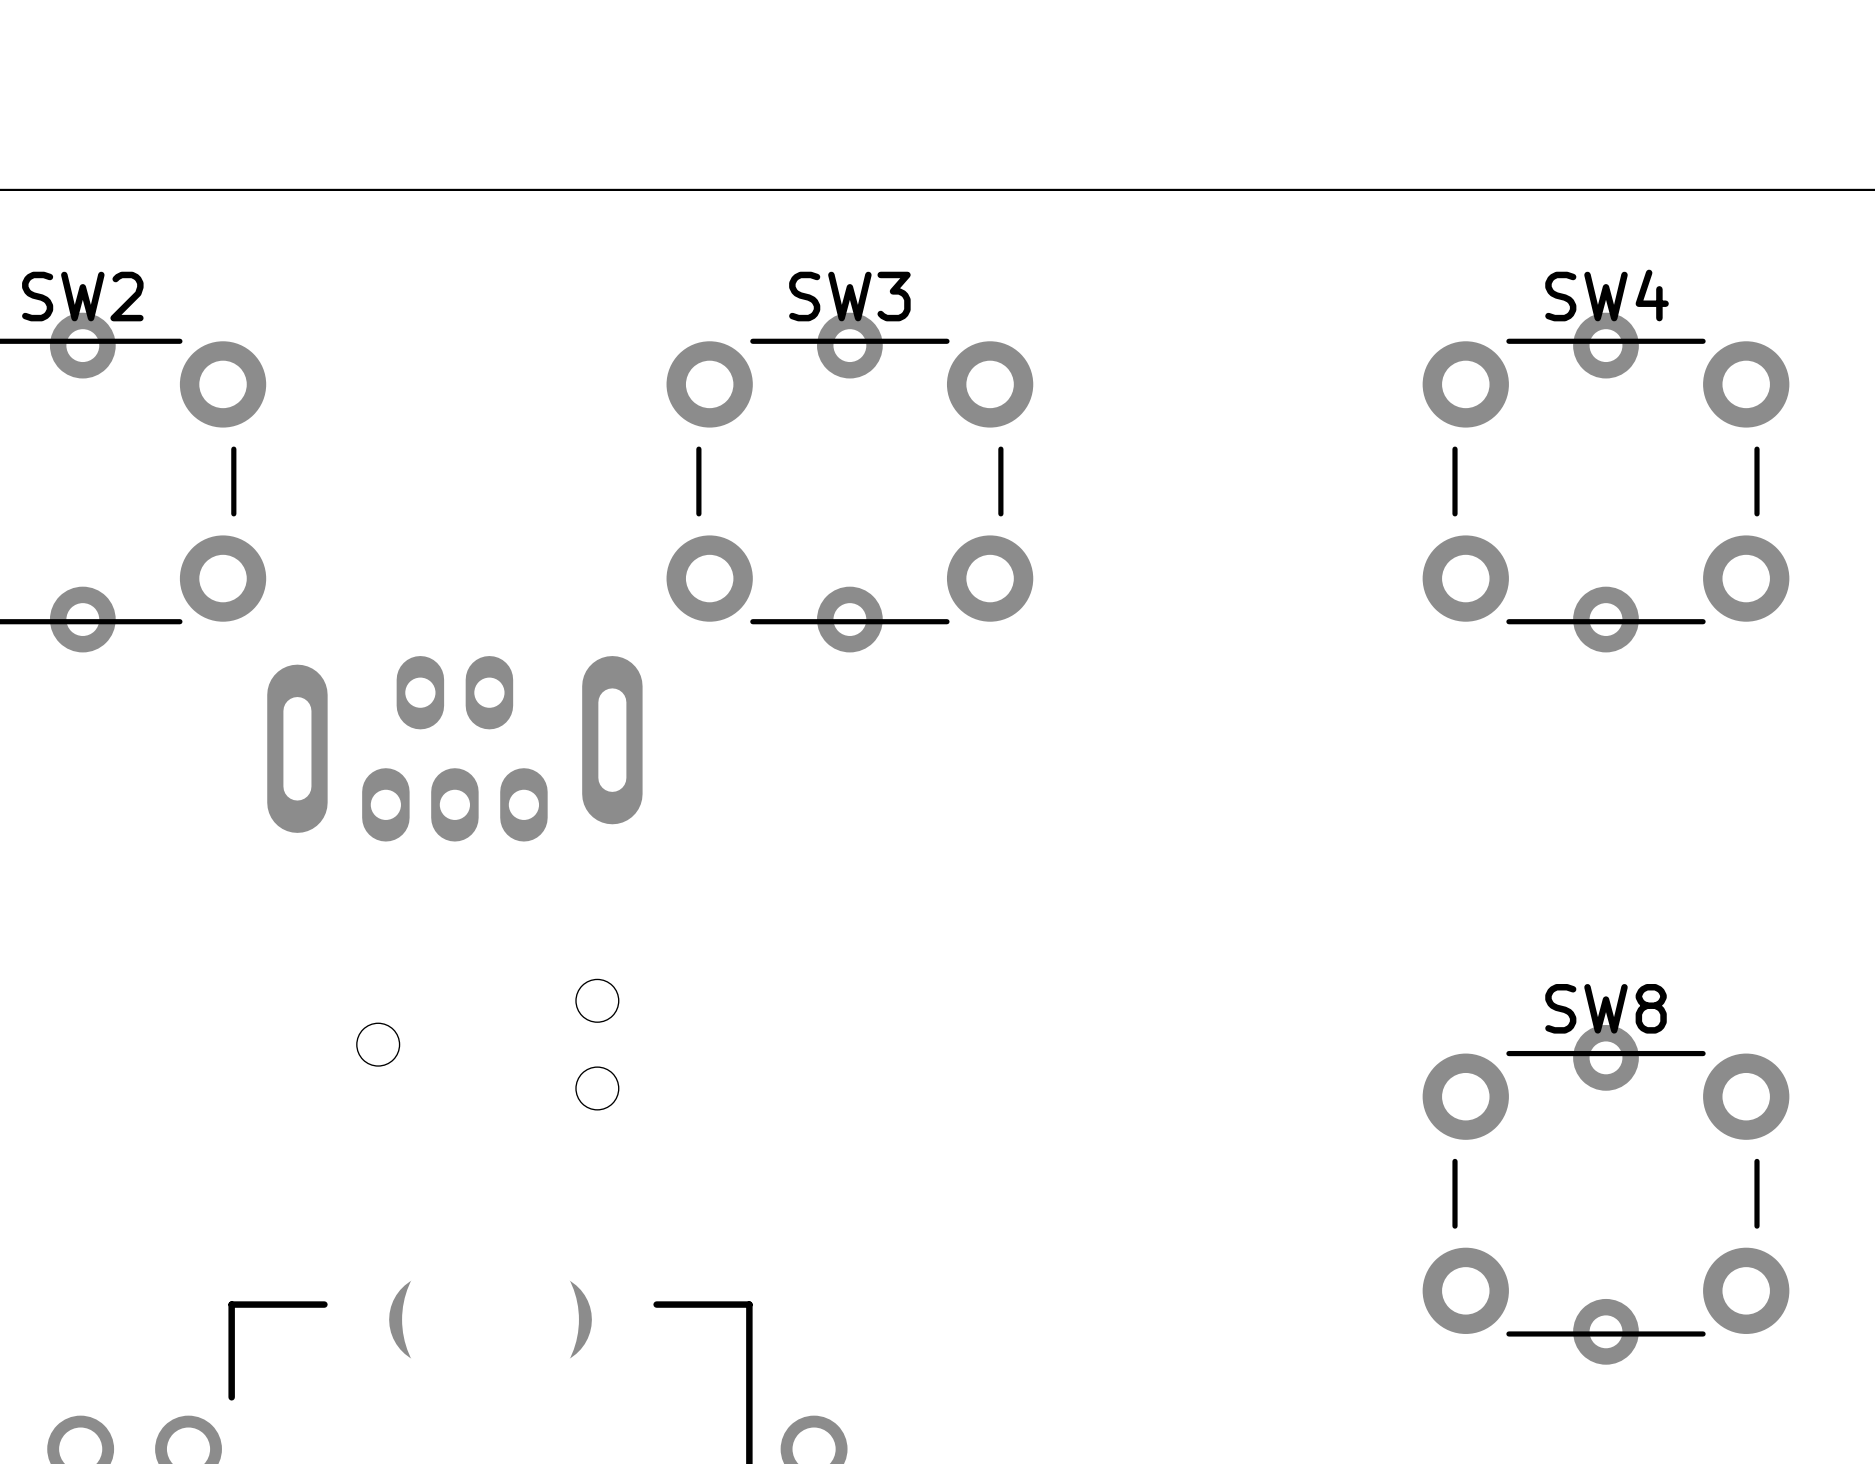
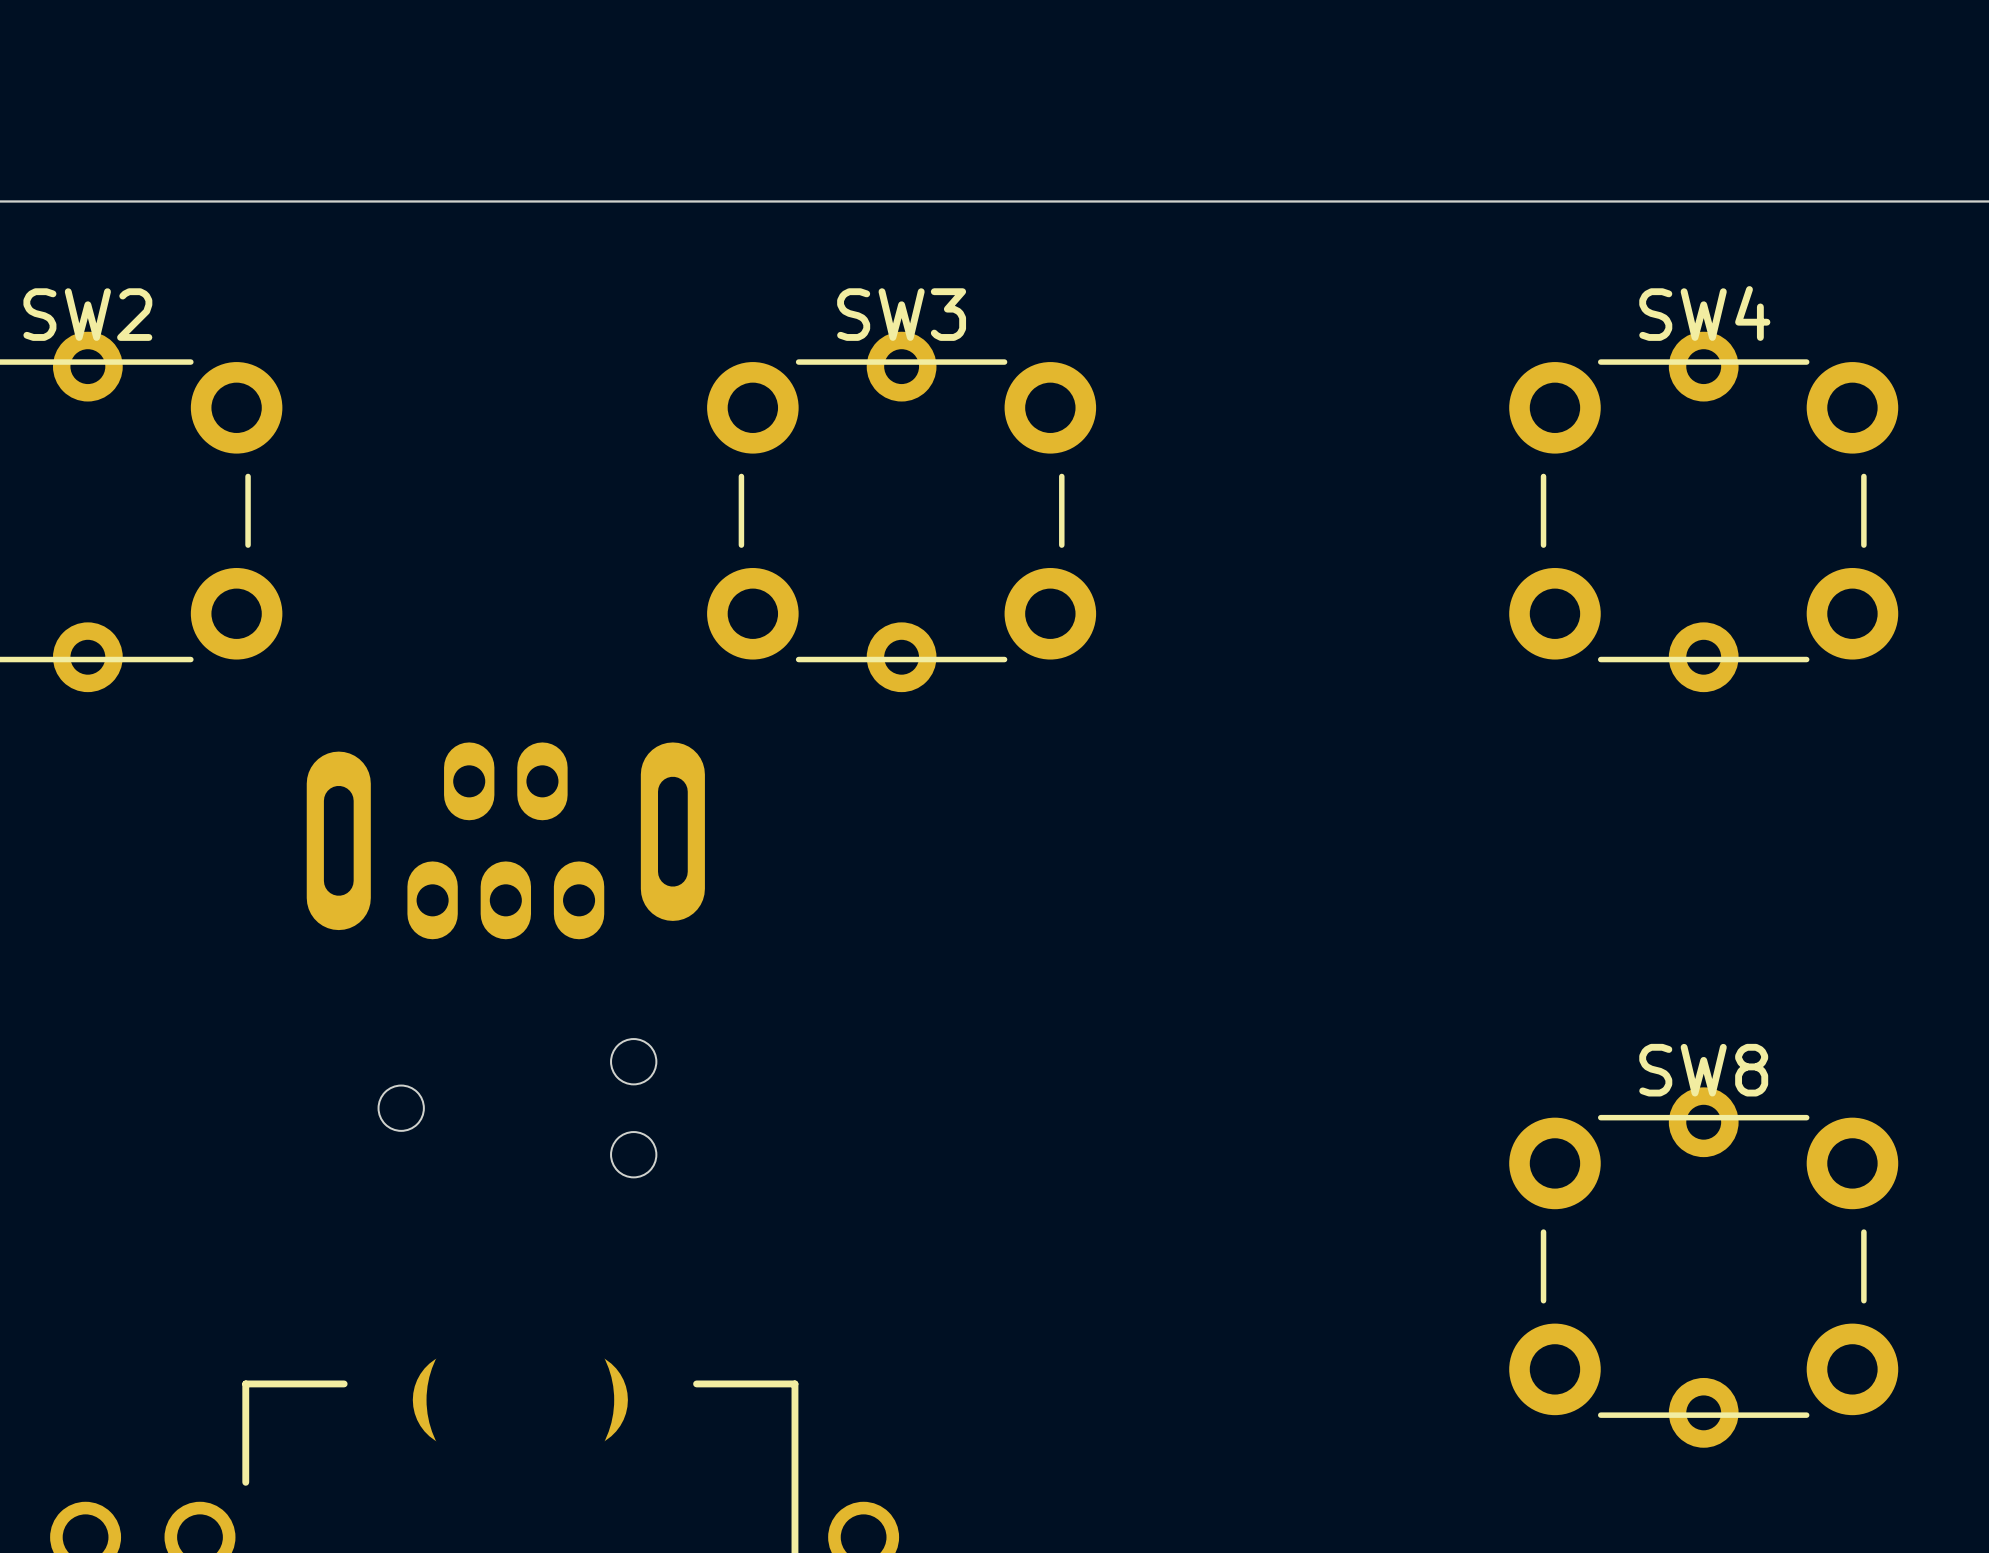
part position: (454, 748) -> (505, 840)

